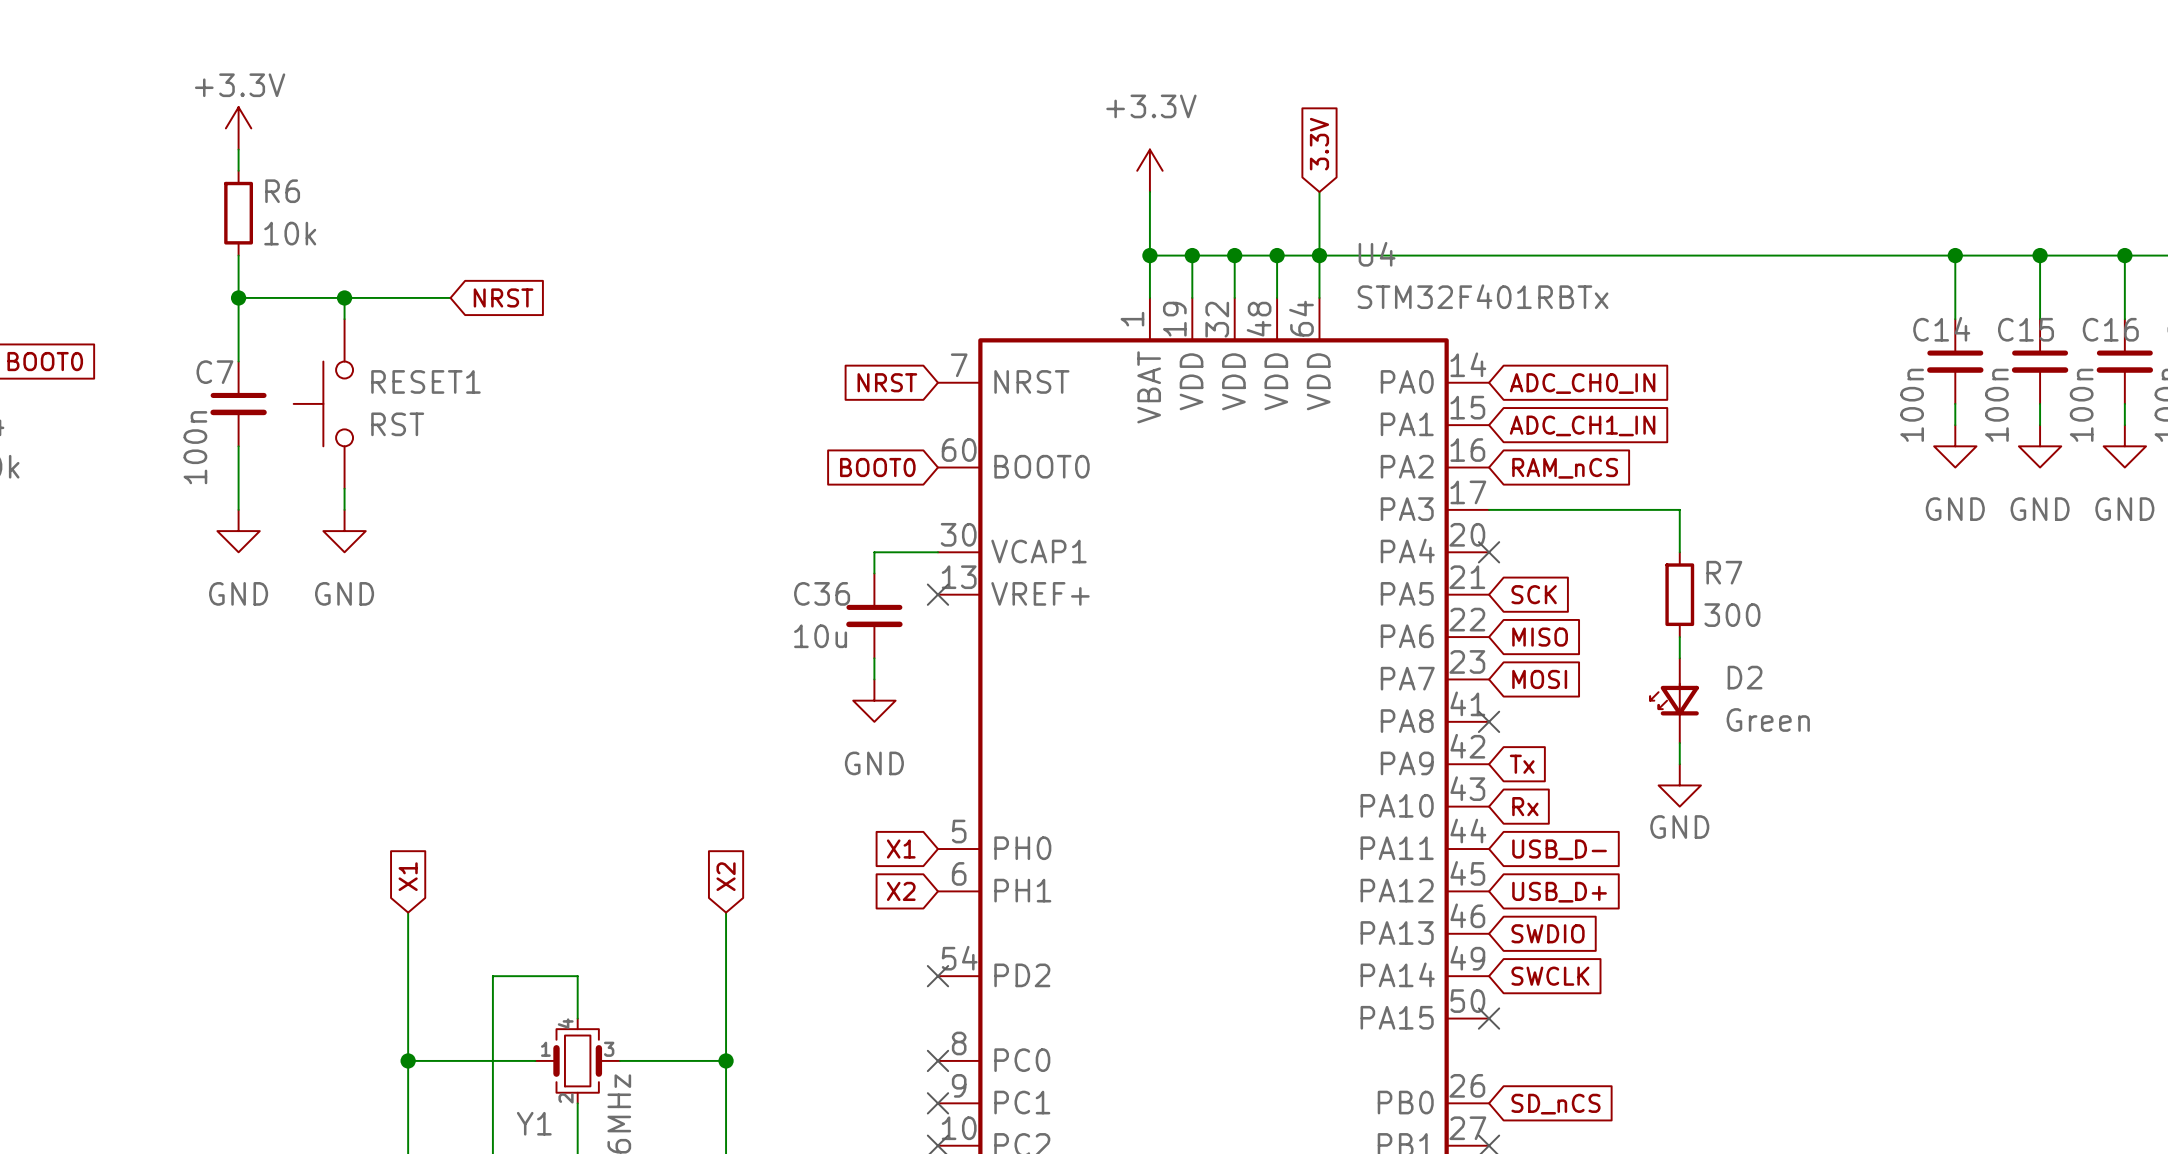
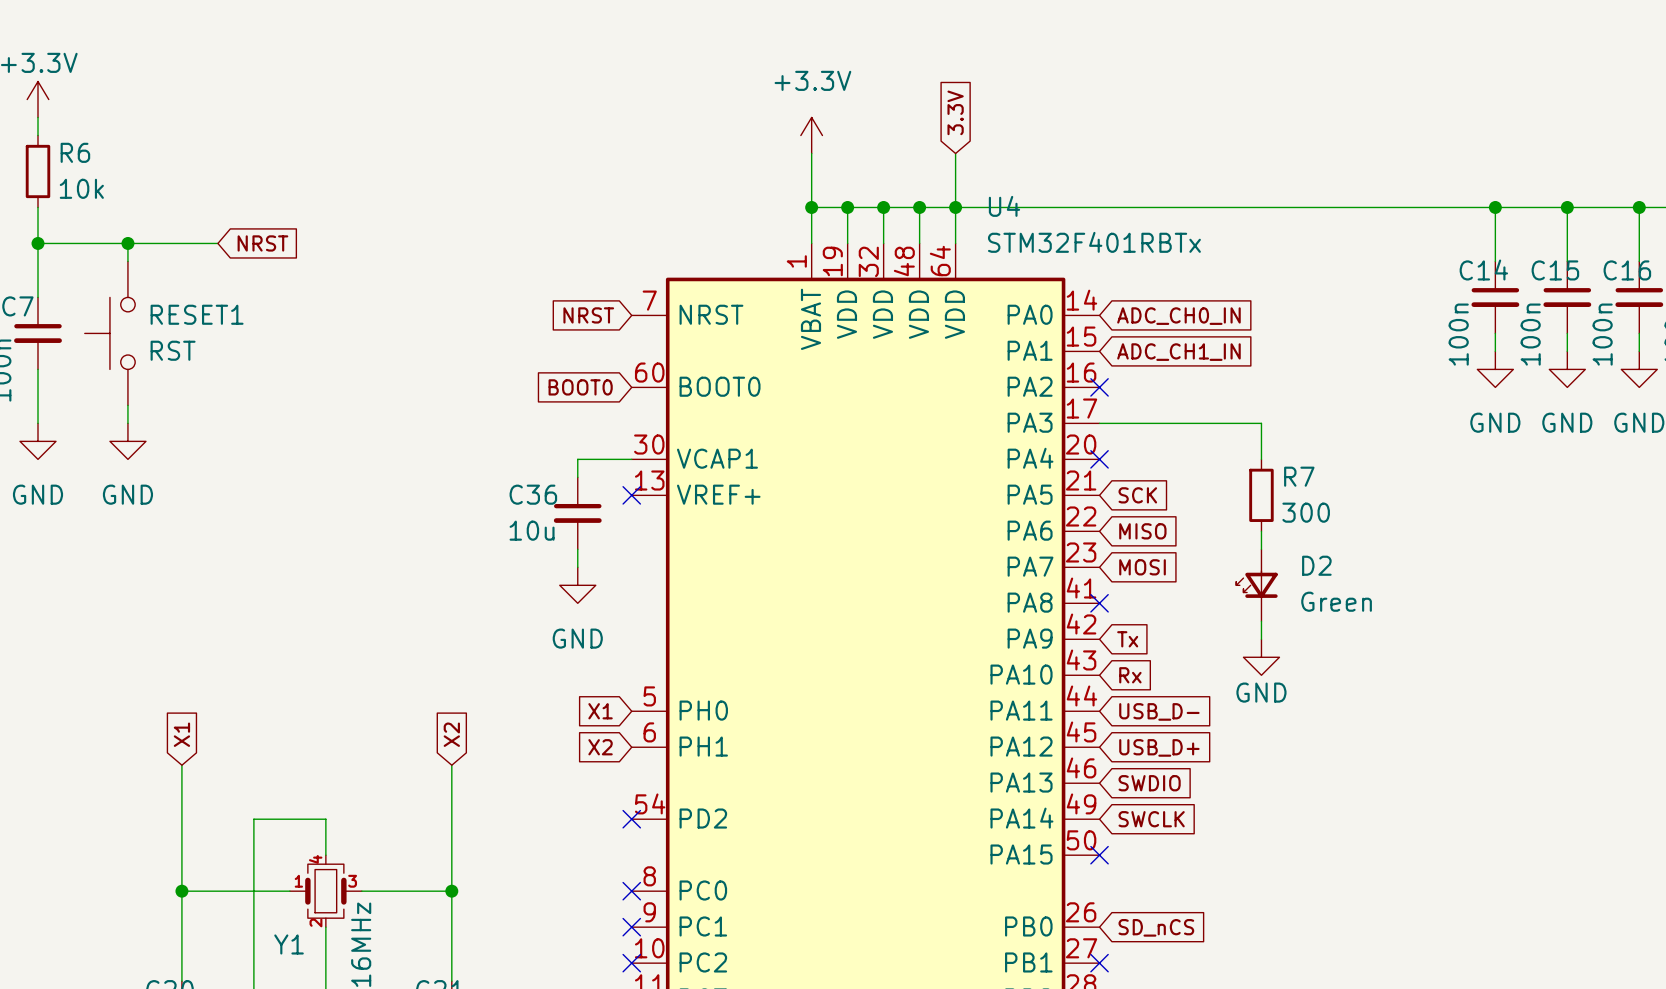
no-connect mark: none -> (1099, 387)
global label: RAM_nCS (1565, 468) -> none

